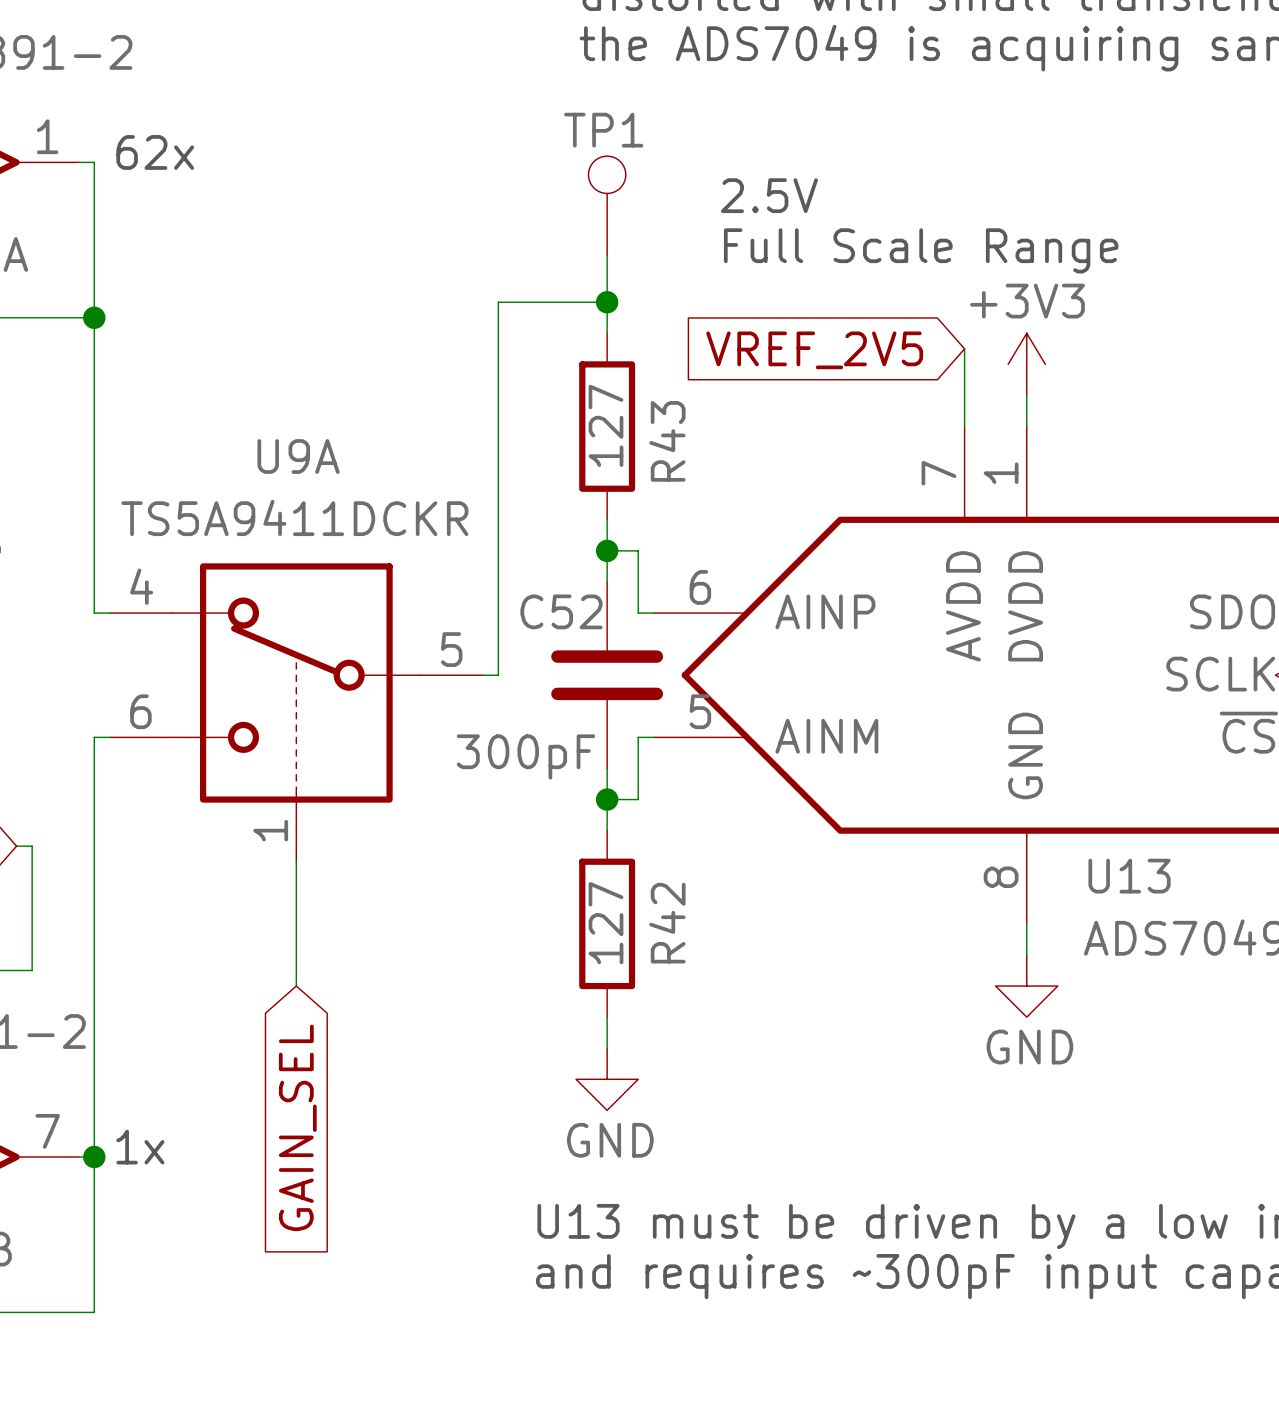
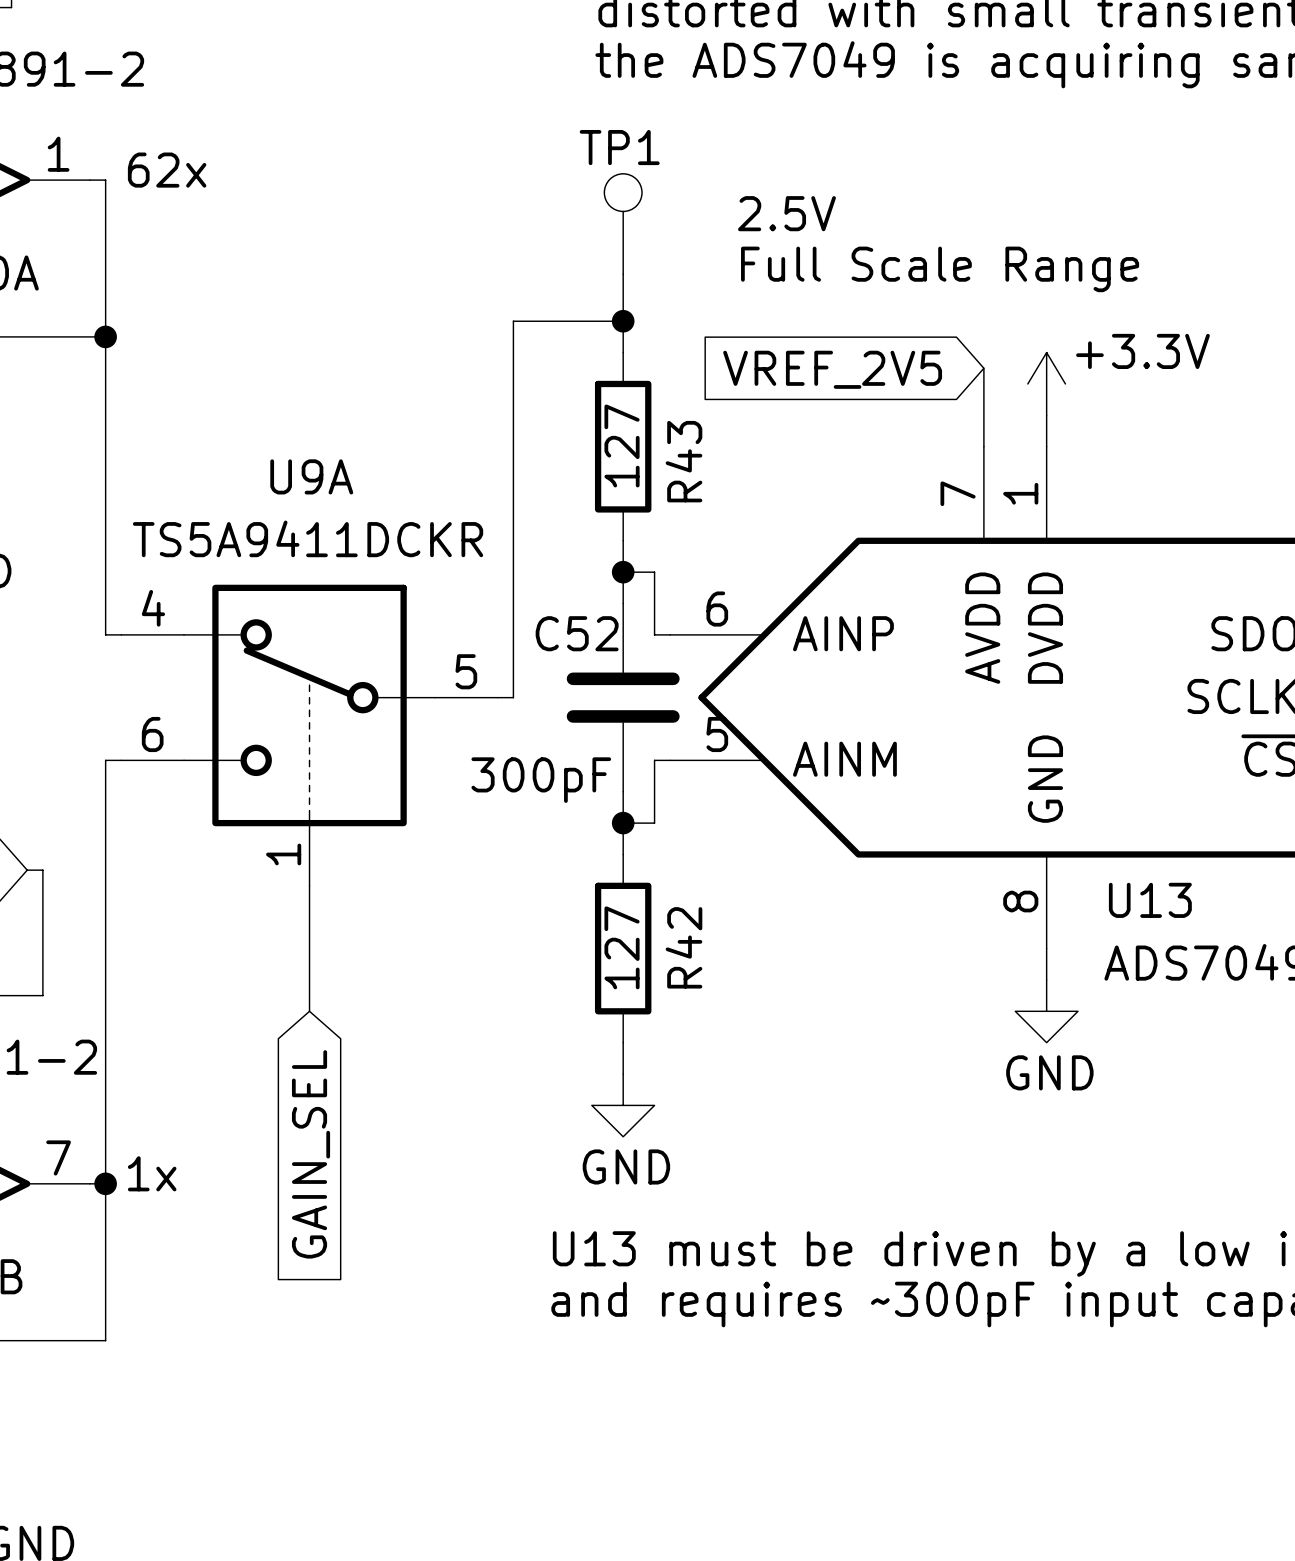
power symbol: +3V3 (1026, 364) -> +3.3V (1046, 383)

